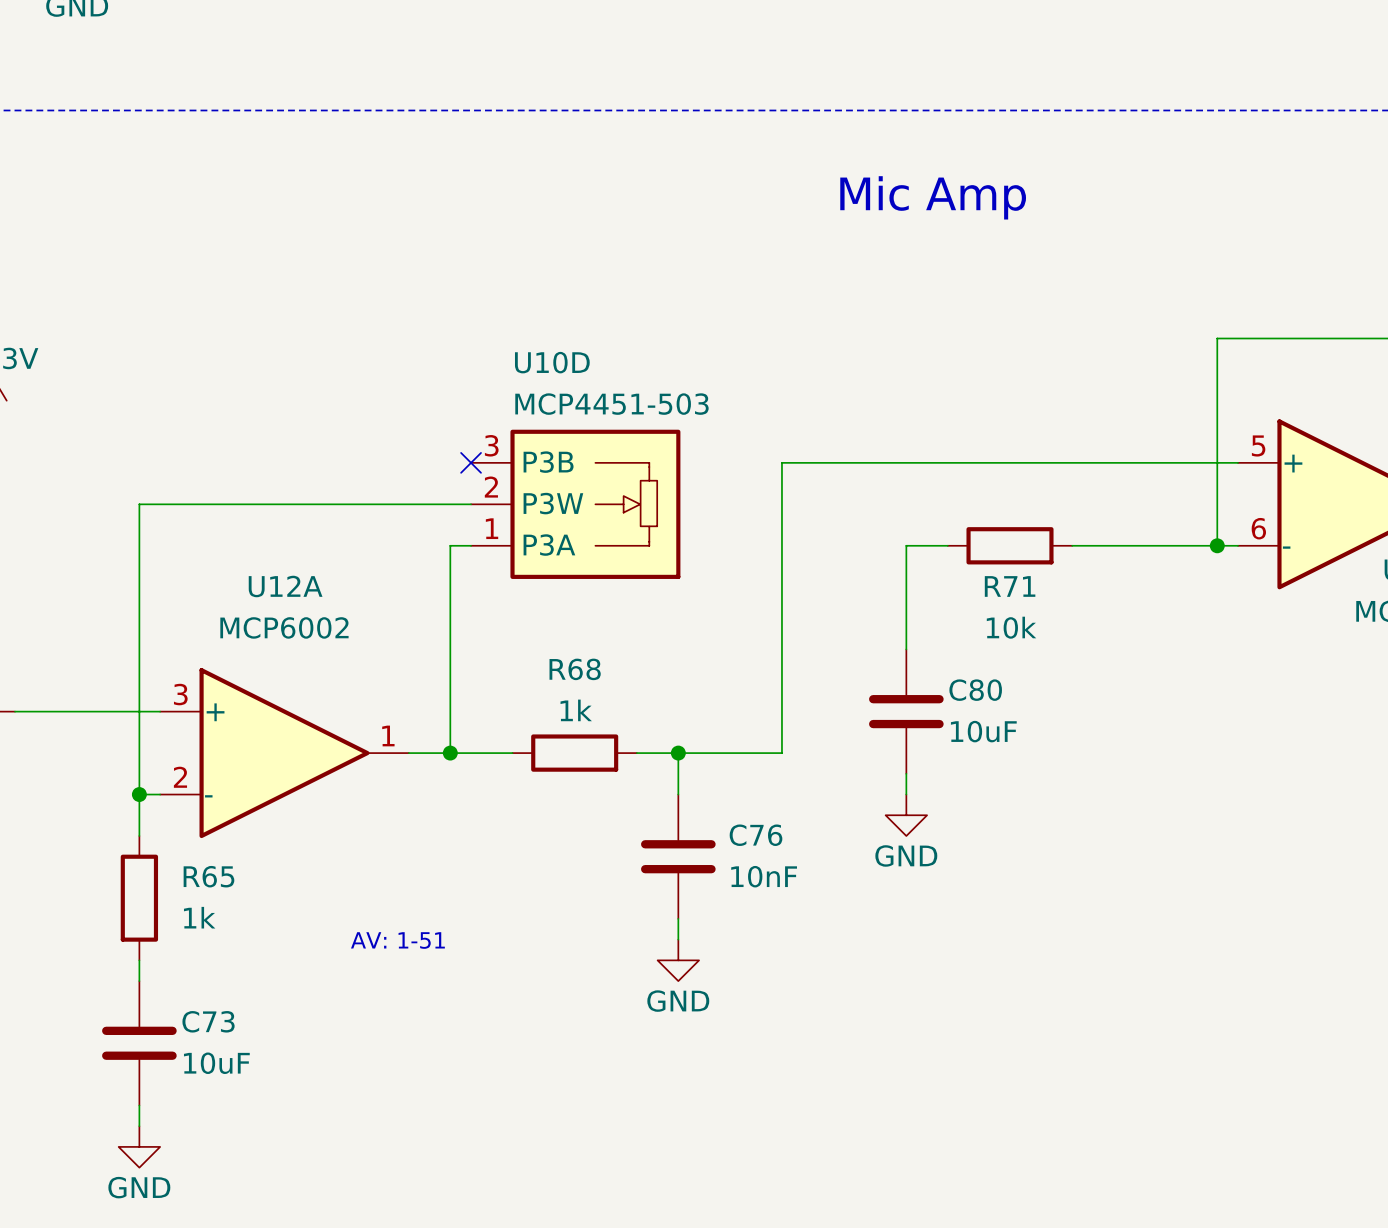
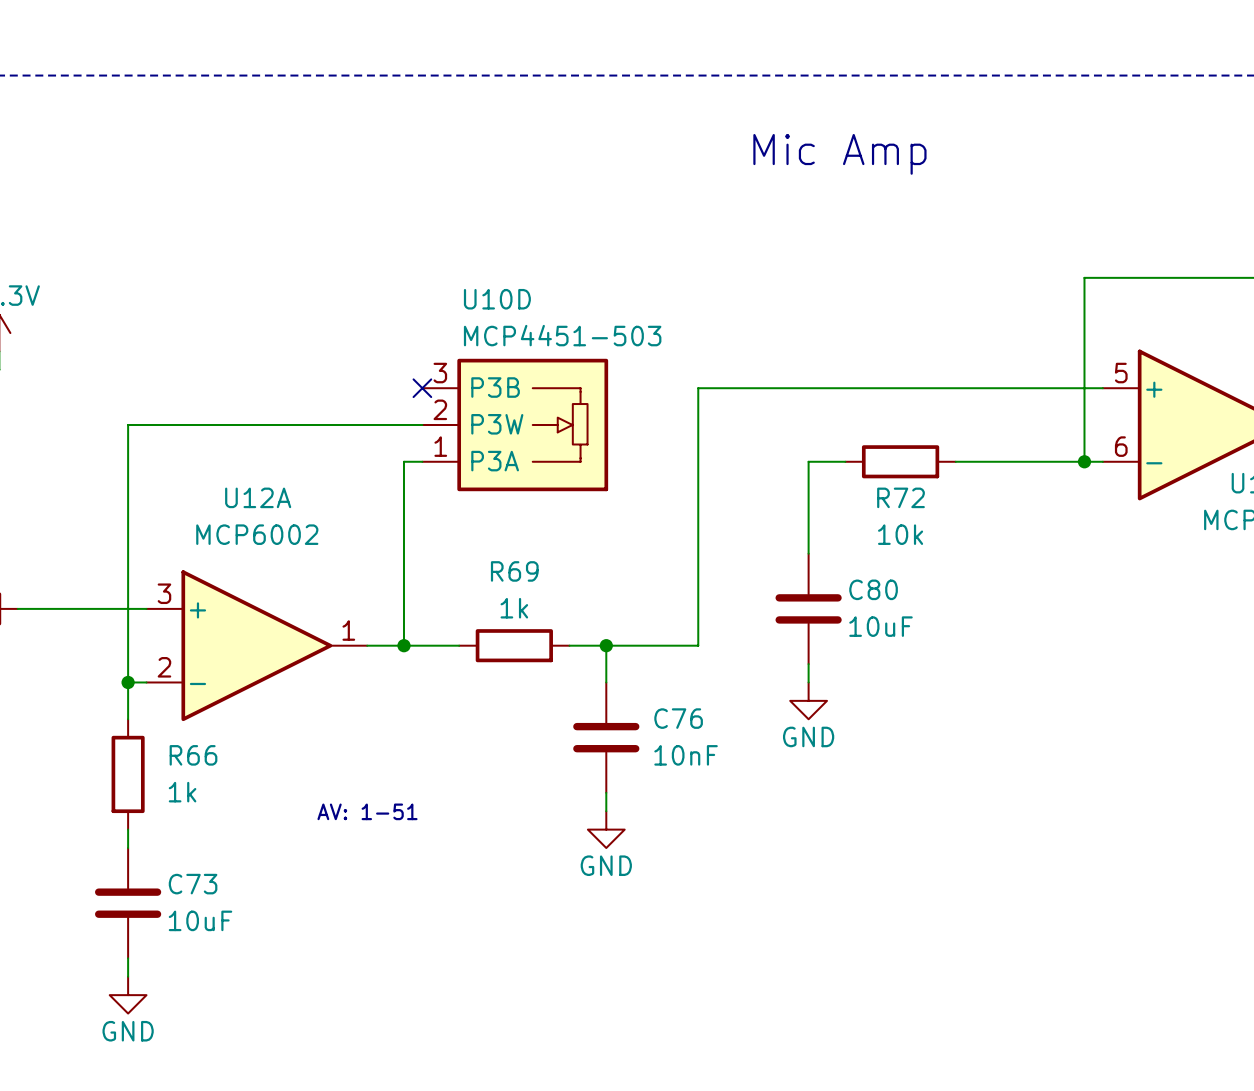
R71 name: R71 (1010, 586) -> R72 (901, 497)
R68 name: R68 (575, 669) -> R69 (514, 571)
R65 name: R65 (208, 876) -> R66 (193, 755)

